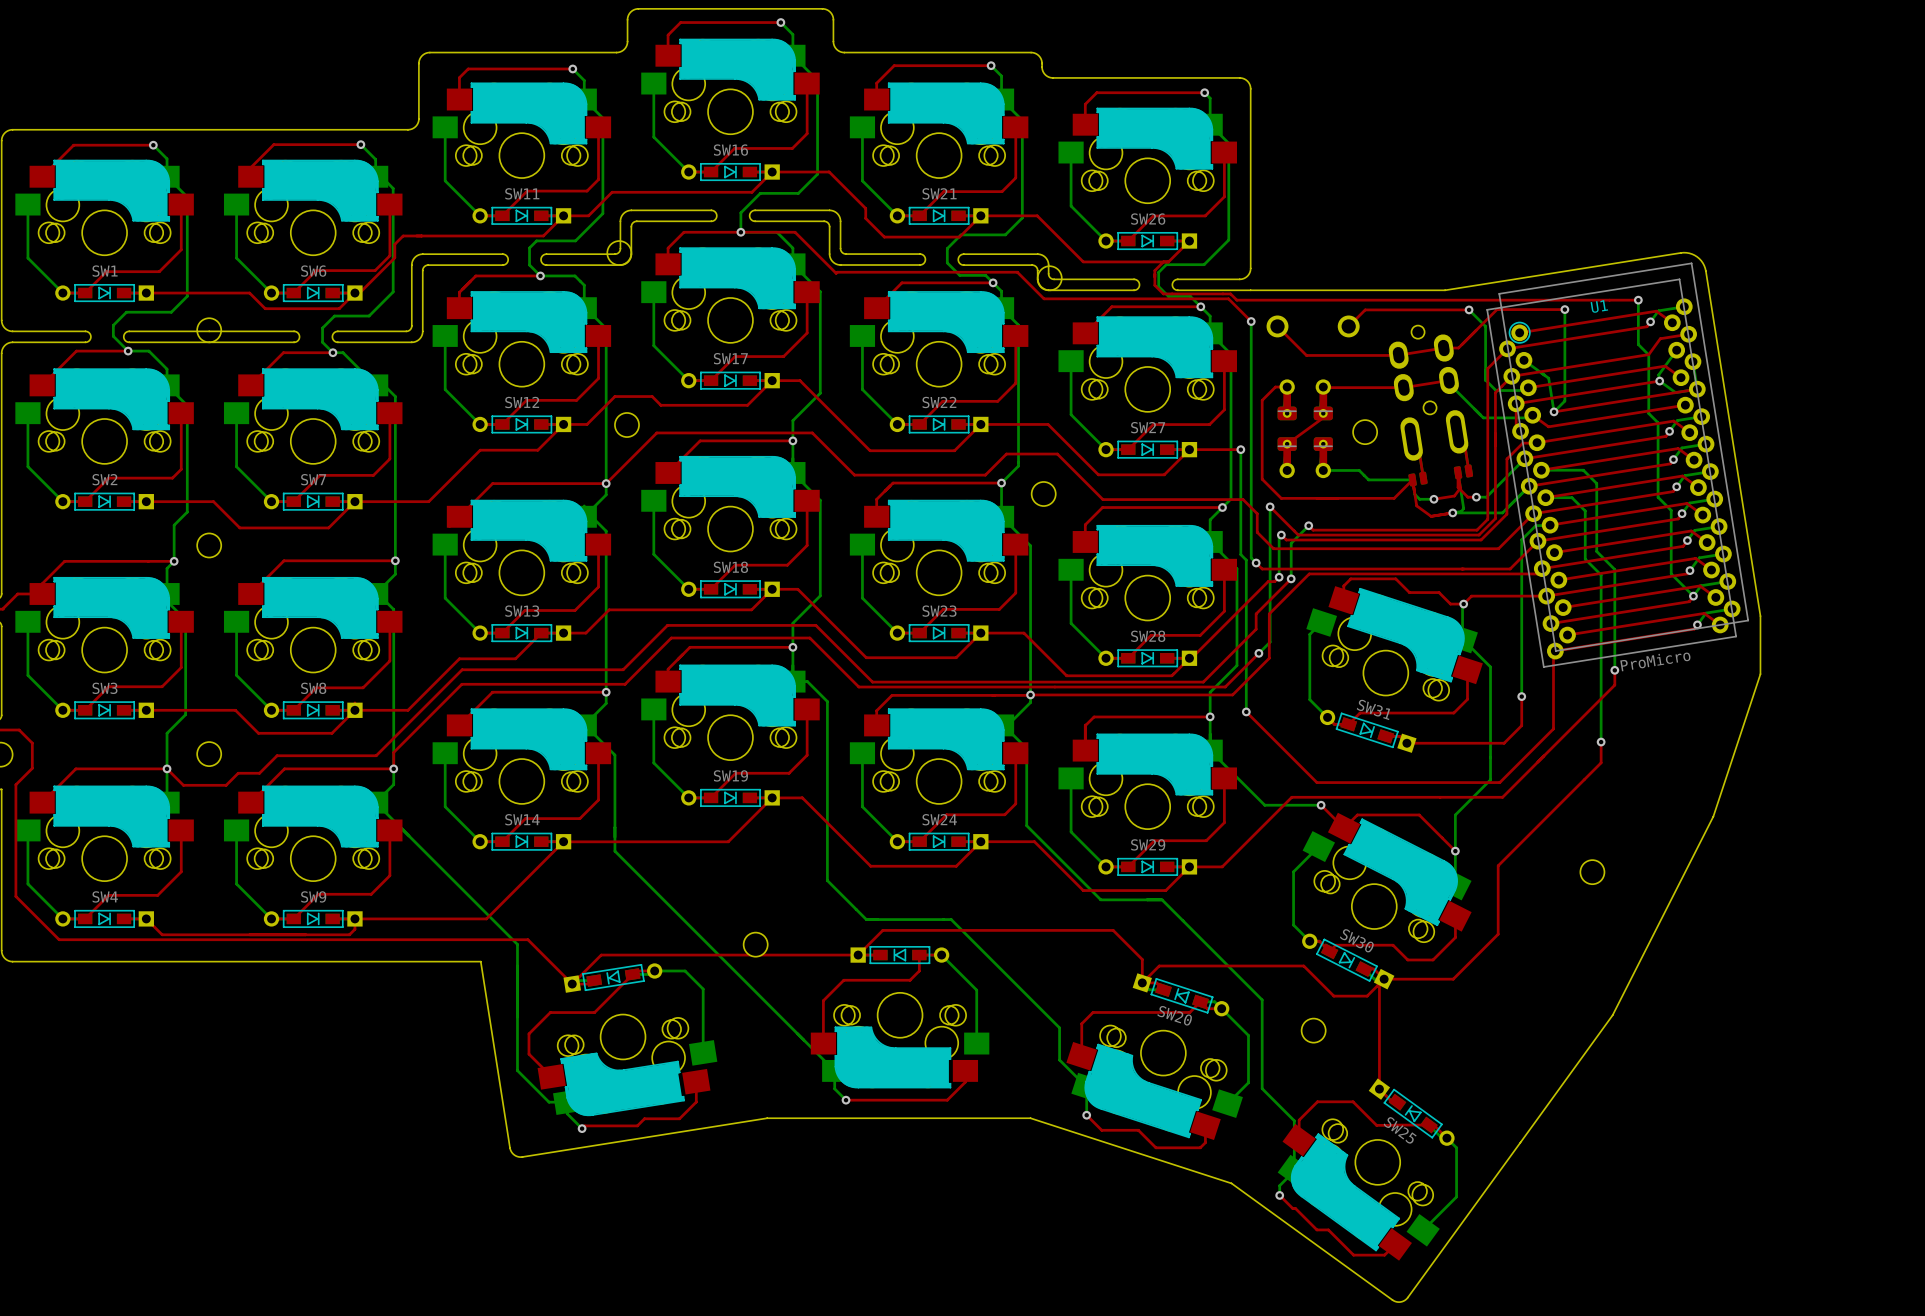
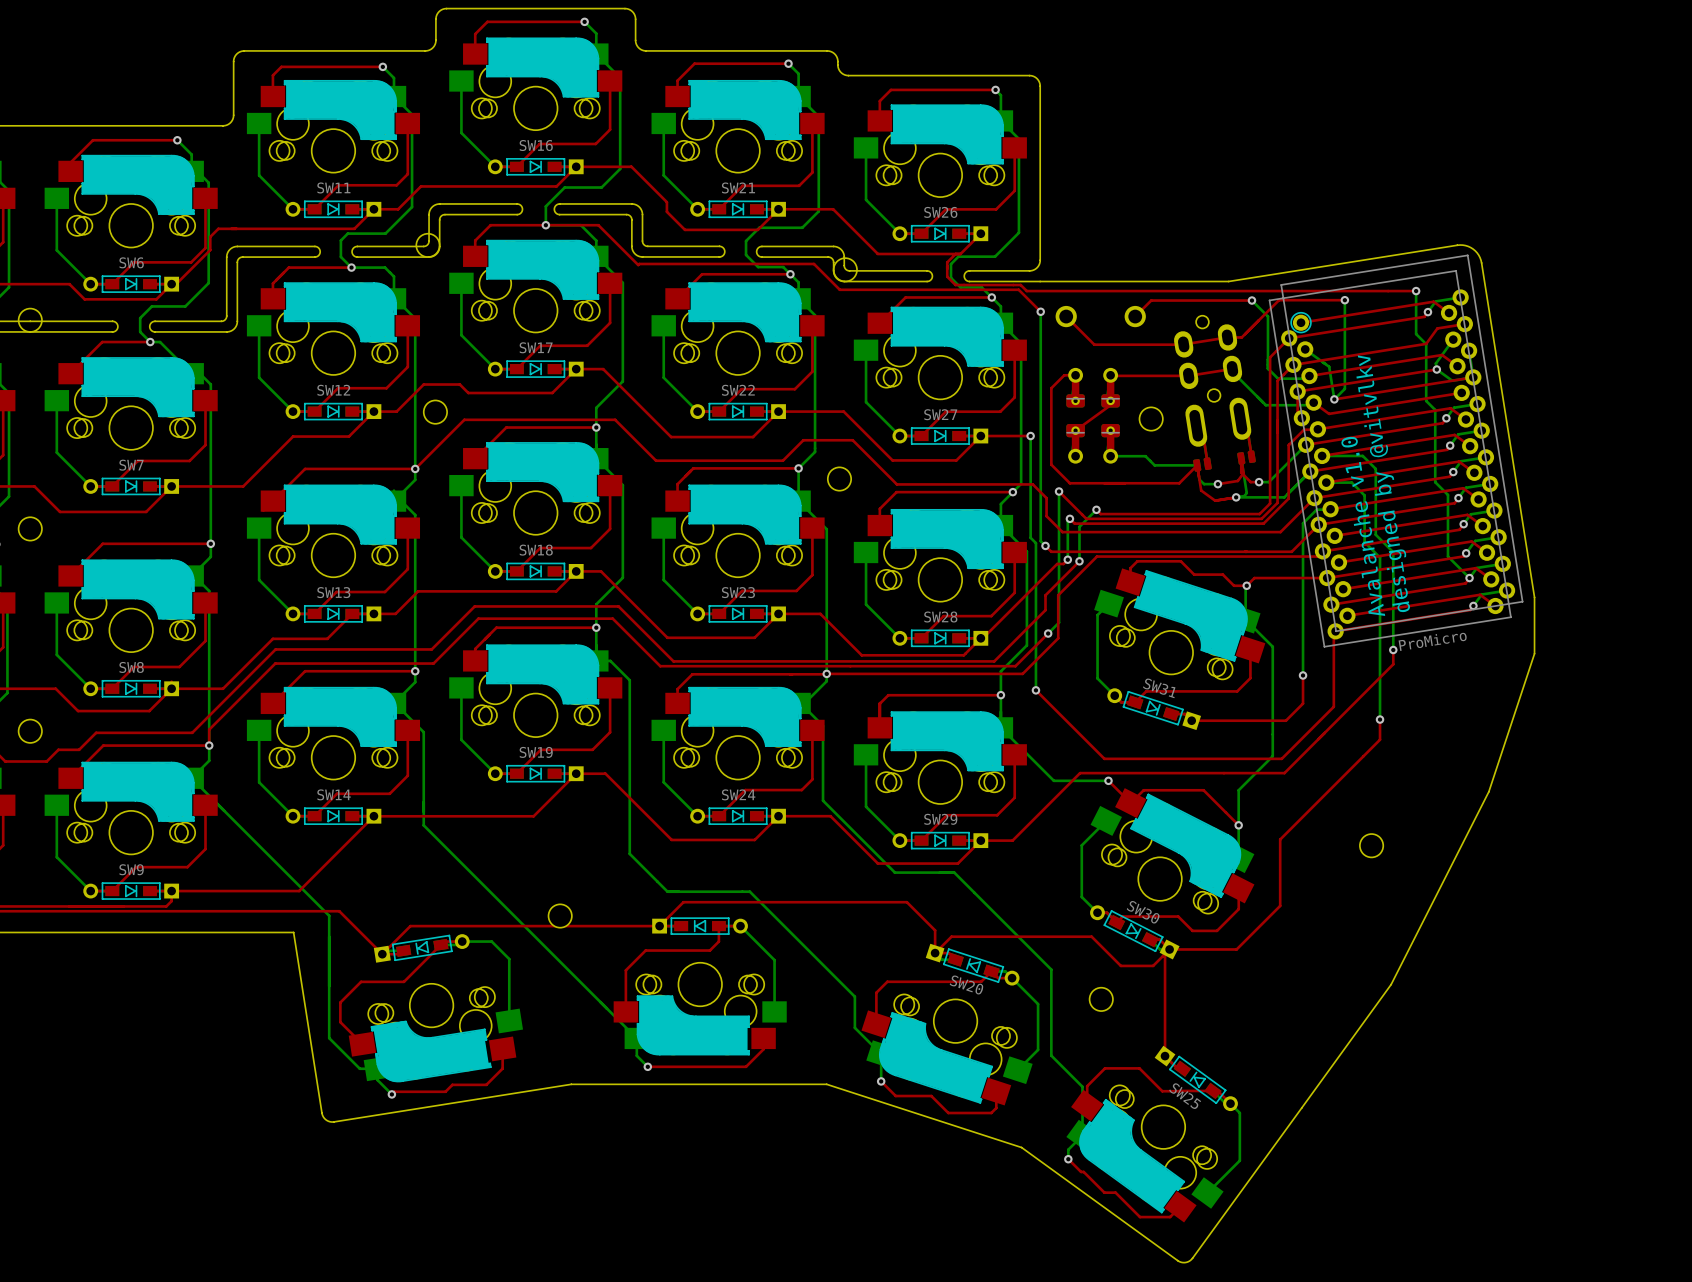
U1 name: U1 (1599, 306) -> none
text: none -> designed by @vitvlkv (1383, 483)
text: none -> Avalanche v1.0 (1363, 526)

